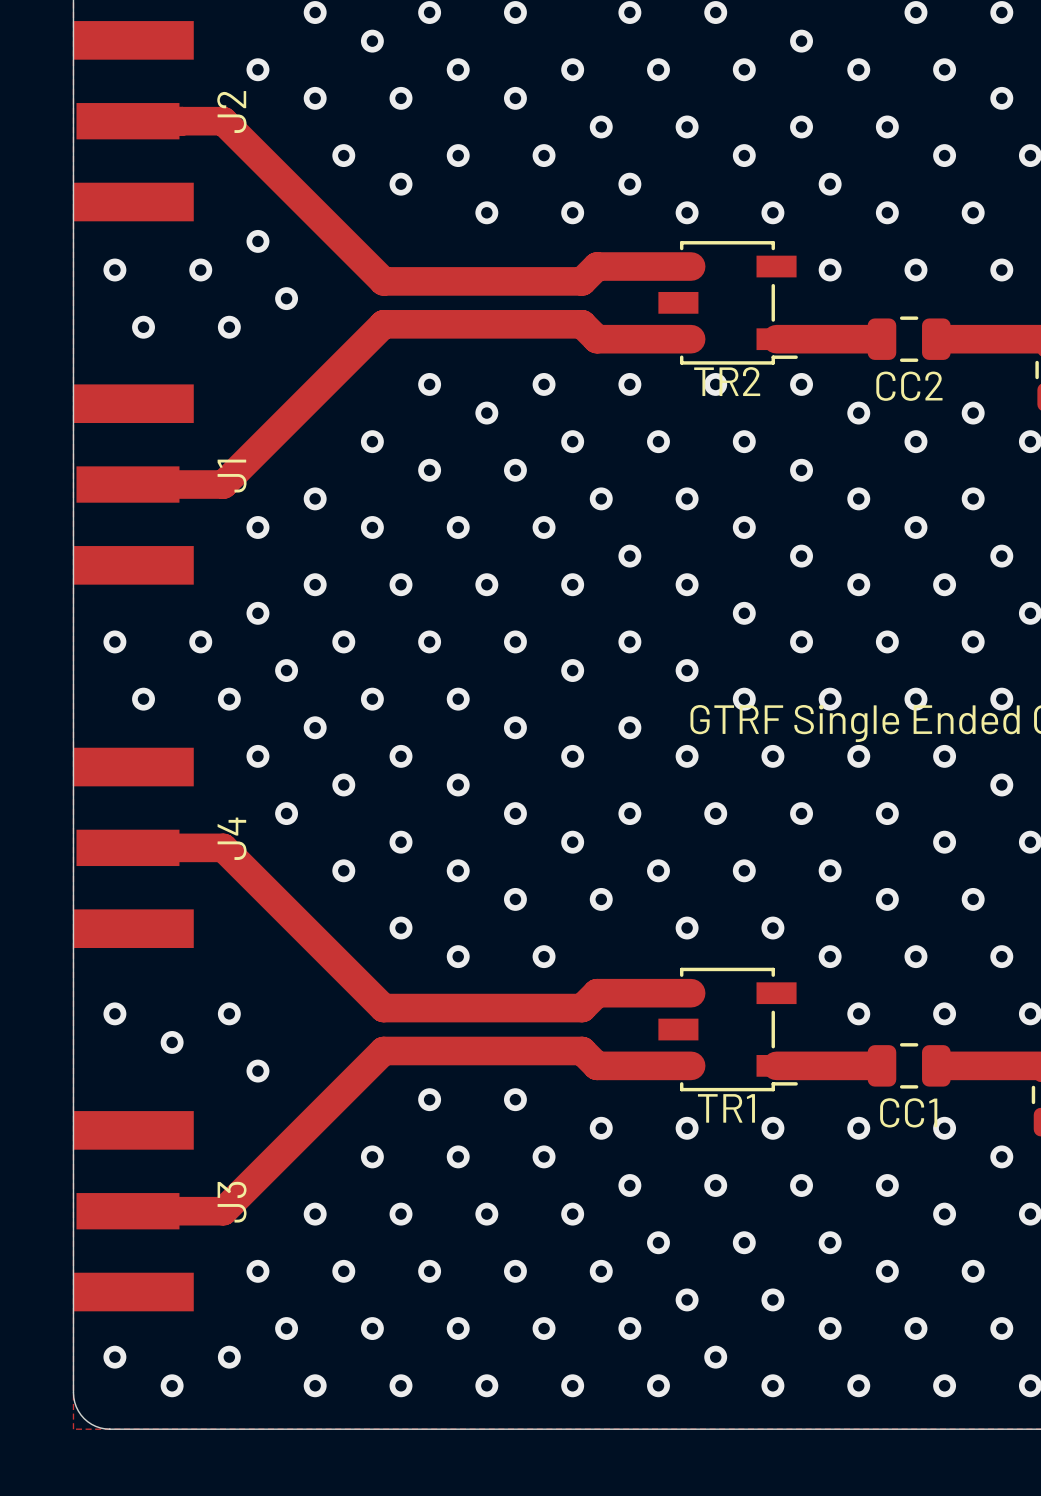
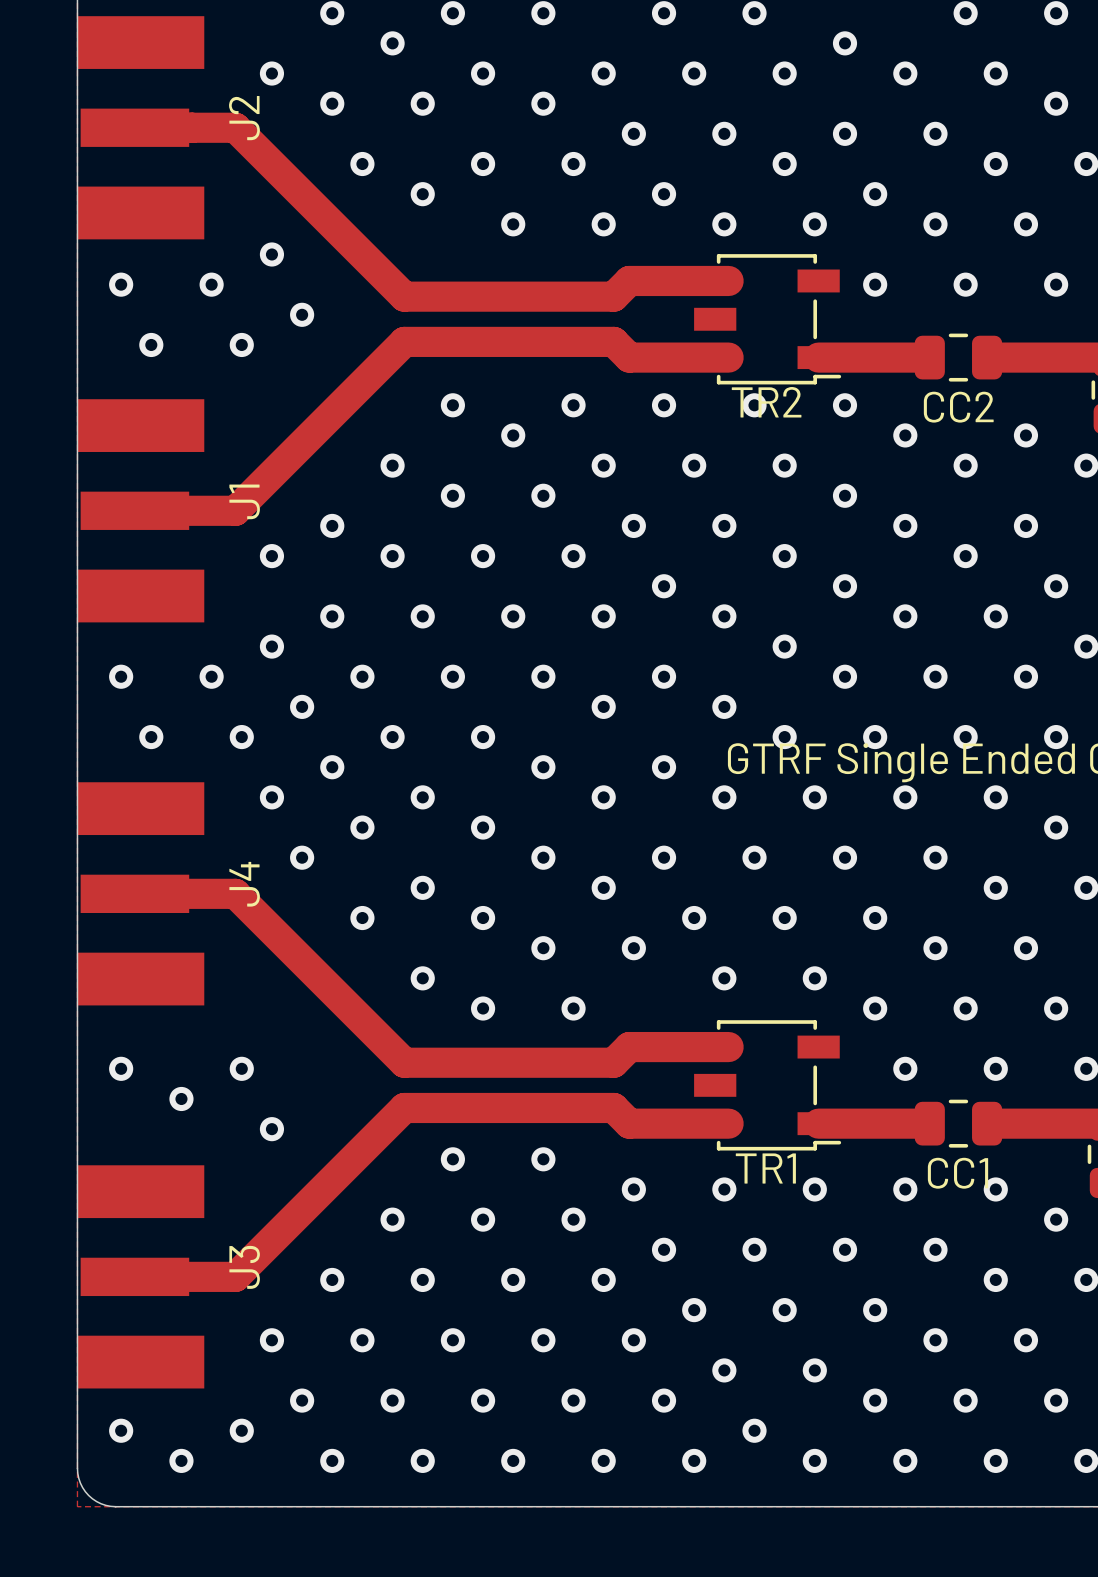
J2 footprint: [73, 21, 194, 222] -> [77, 16, 205, 240]
J1 footprint: [73, 384, 194, 585] -> [77, 399, 205, 623]
J4 footprint: [73, 747, 194, 948] -> [77, 782, 205, 1006]
J3 footprint: [73, 1111, 194, 1312] -> [77, 1165, 205, 1389]

